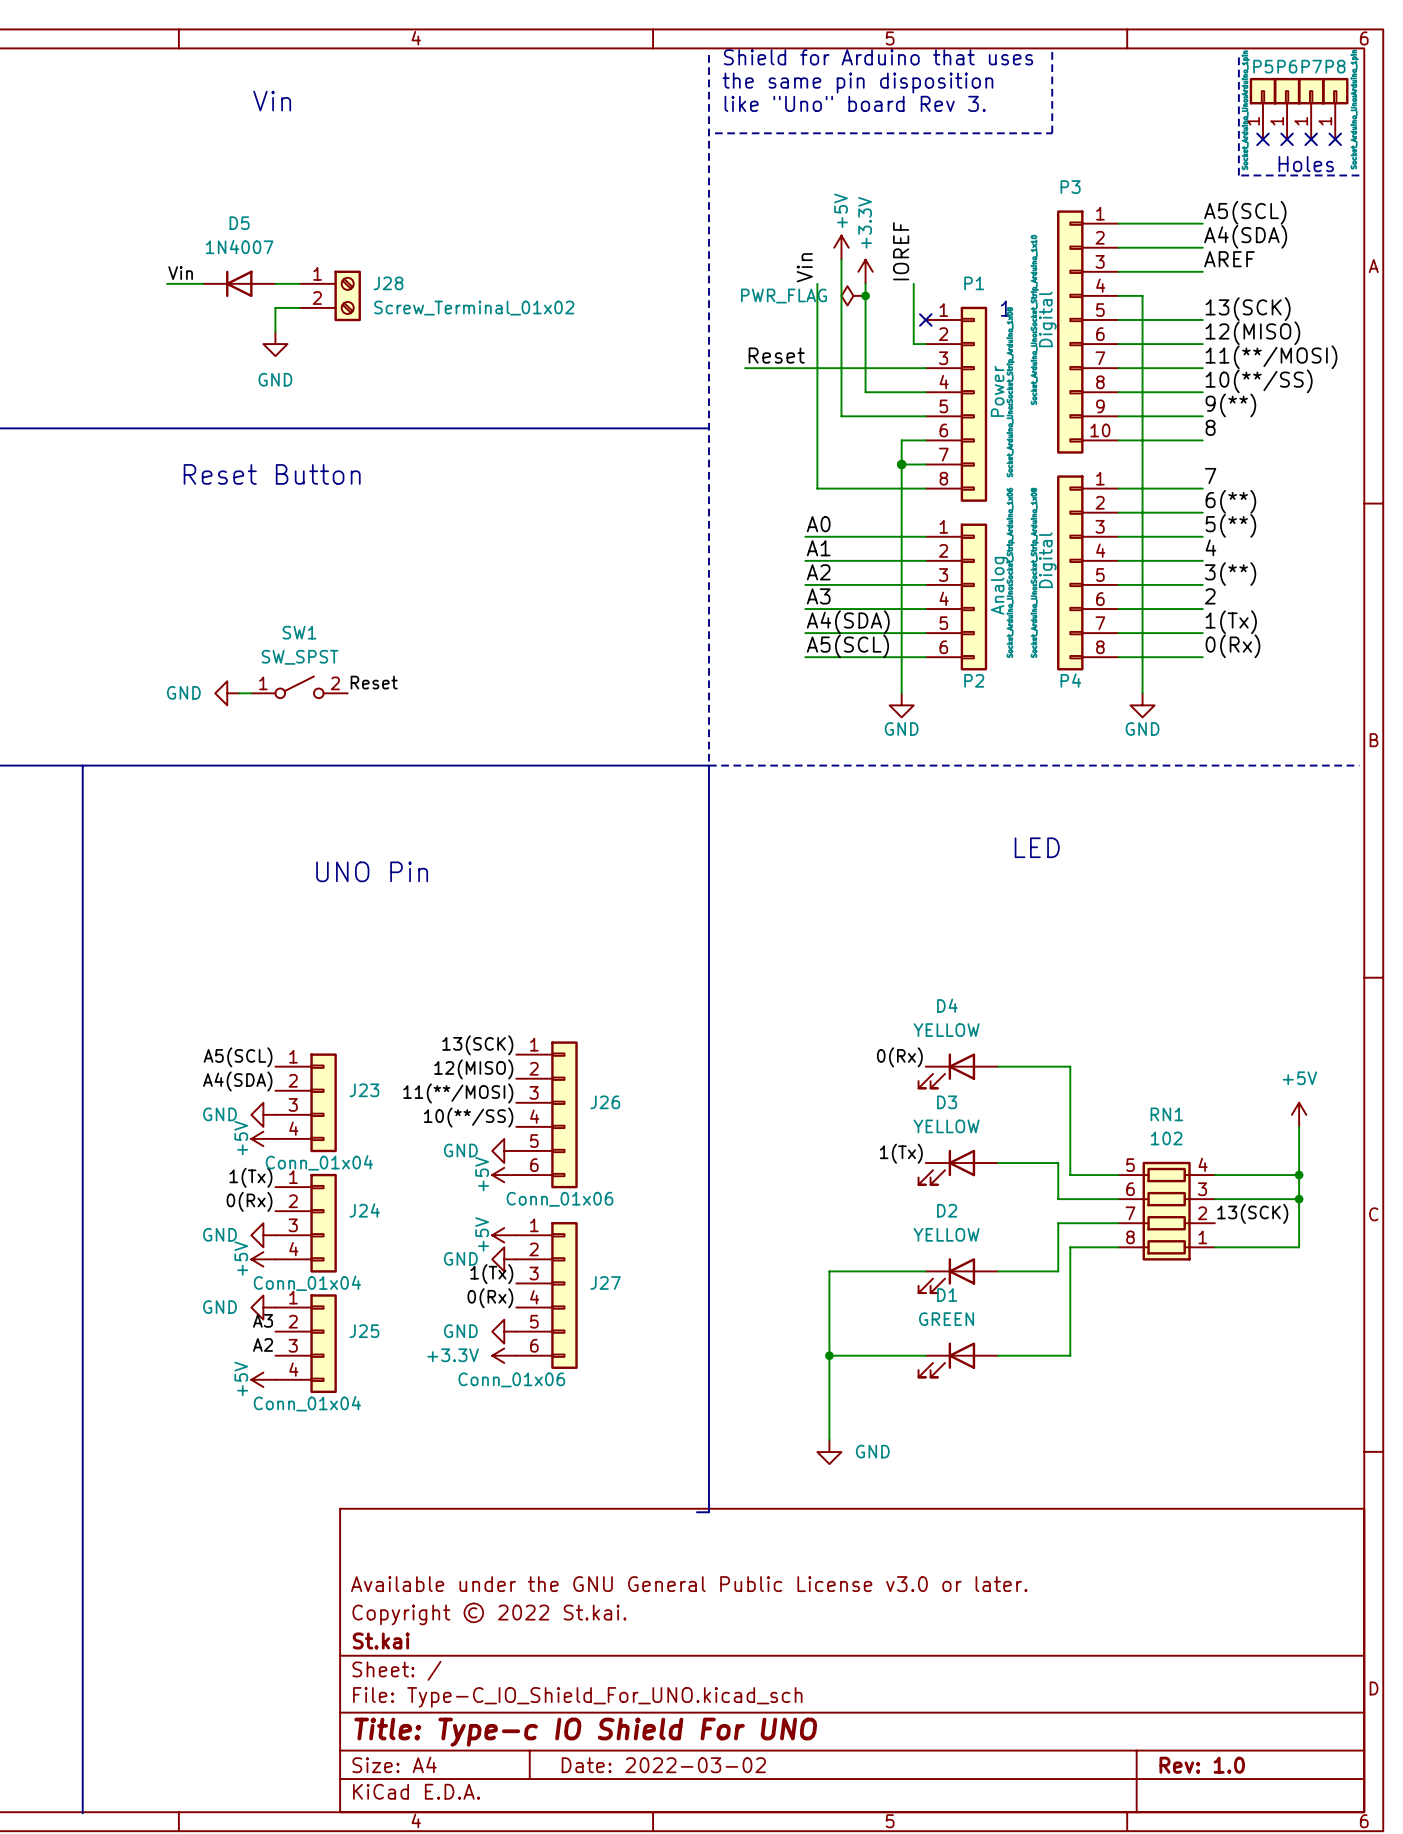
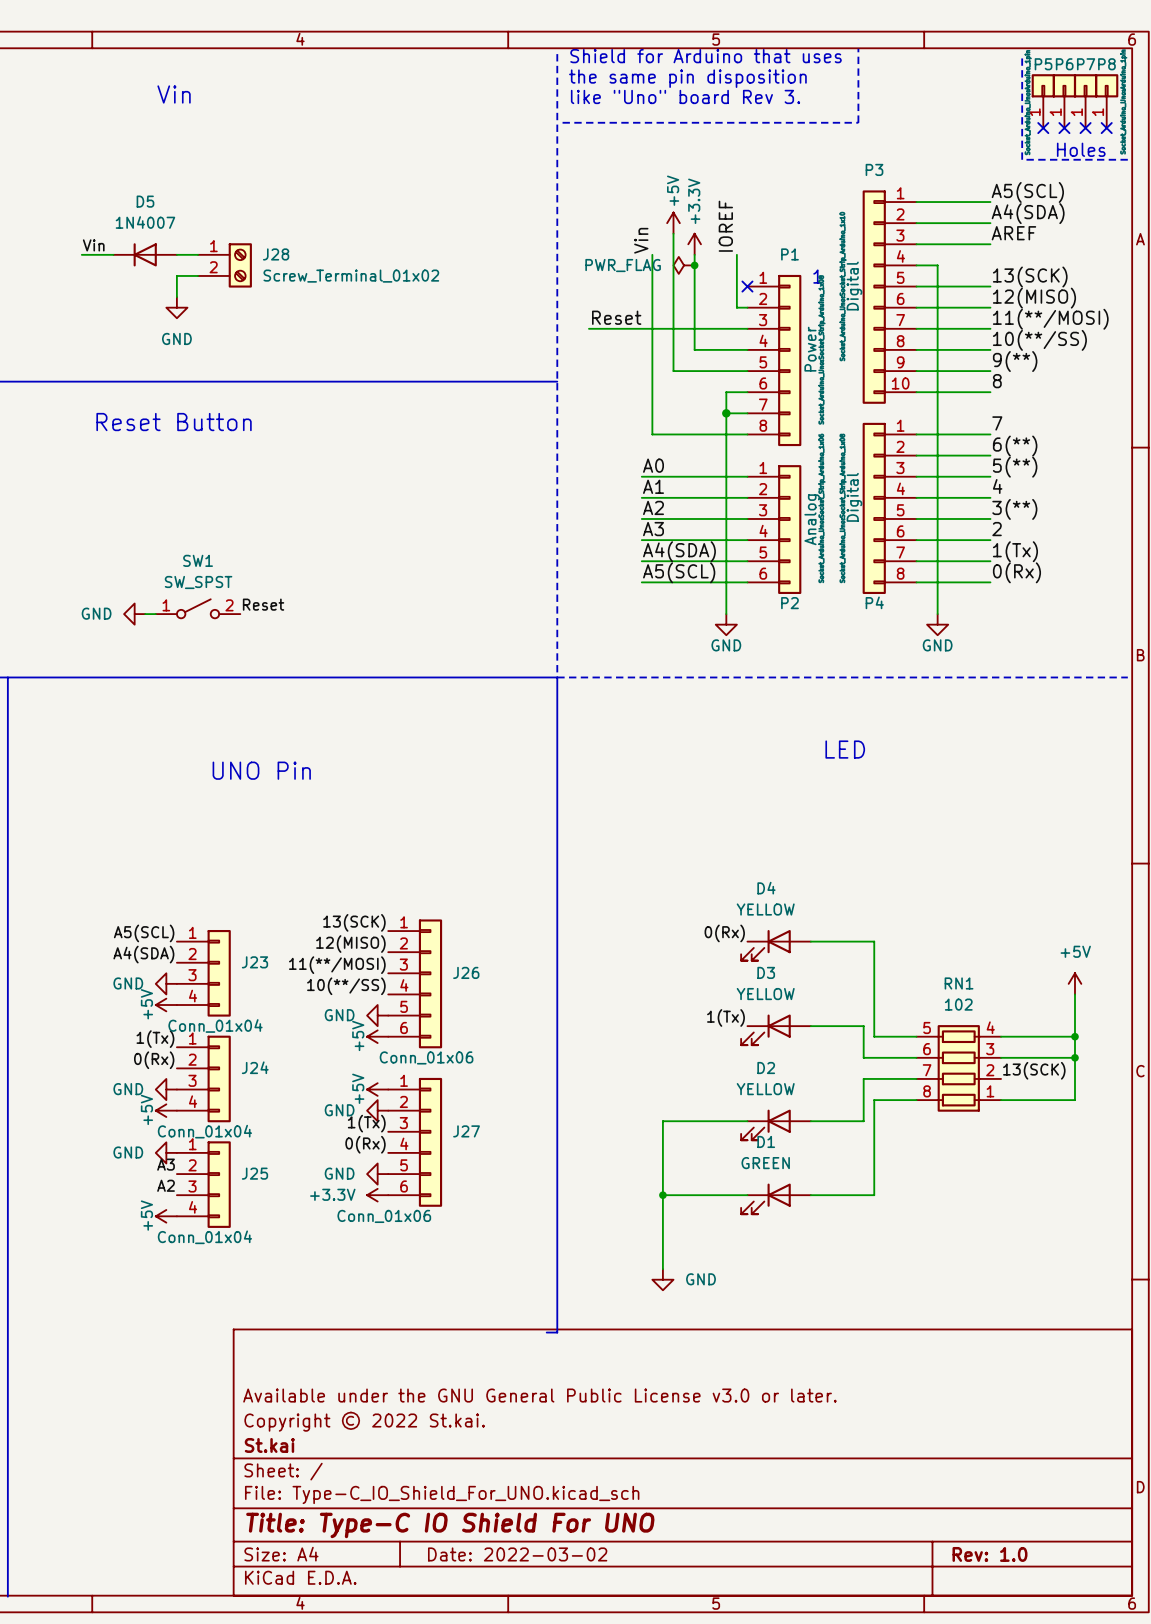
title block: Title: Type-c IO Shield For UNO (585, 1732) -> Title: Type-C IO Shield For UNO (450, 1525)

